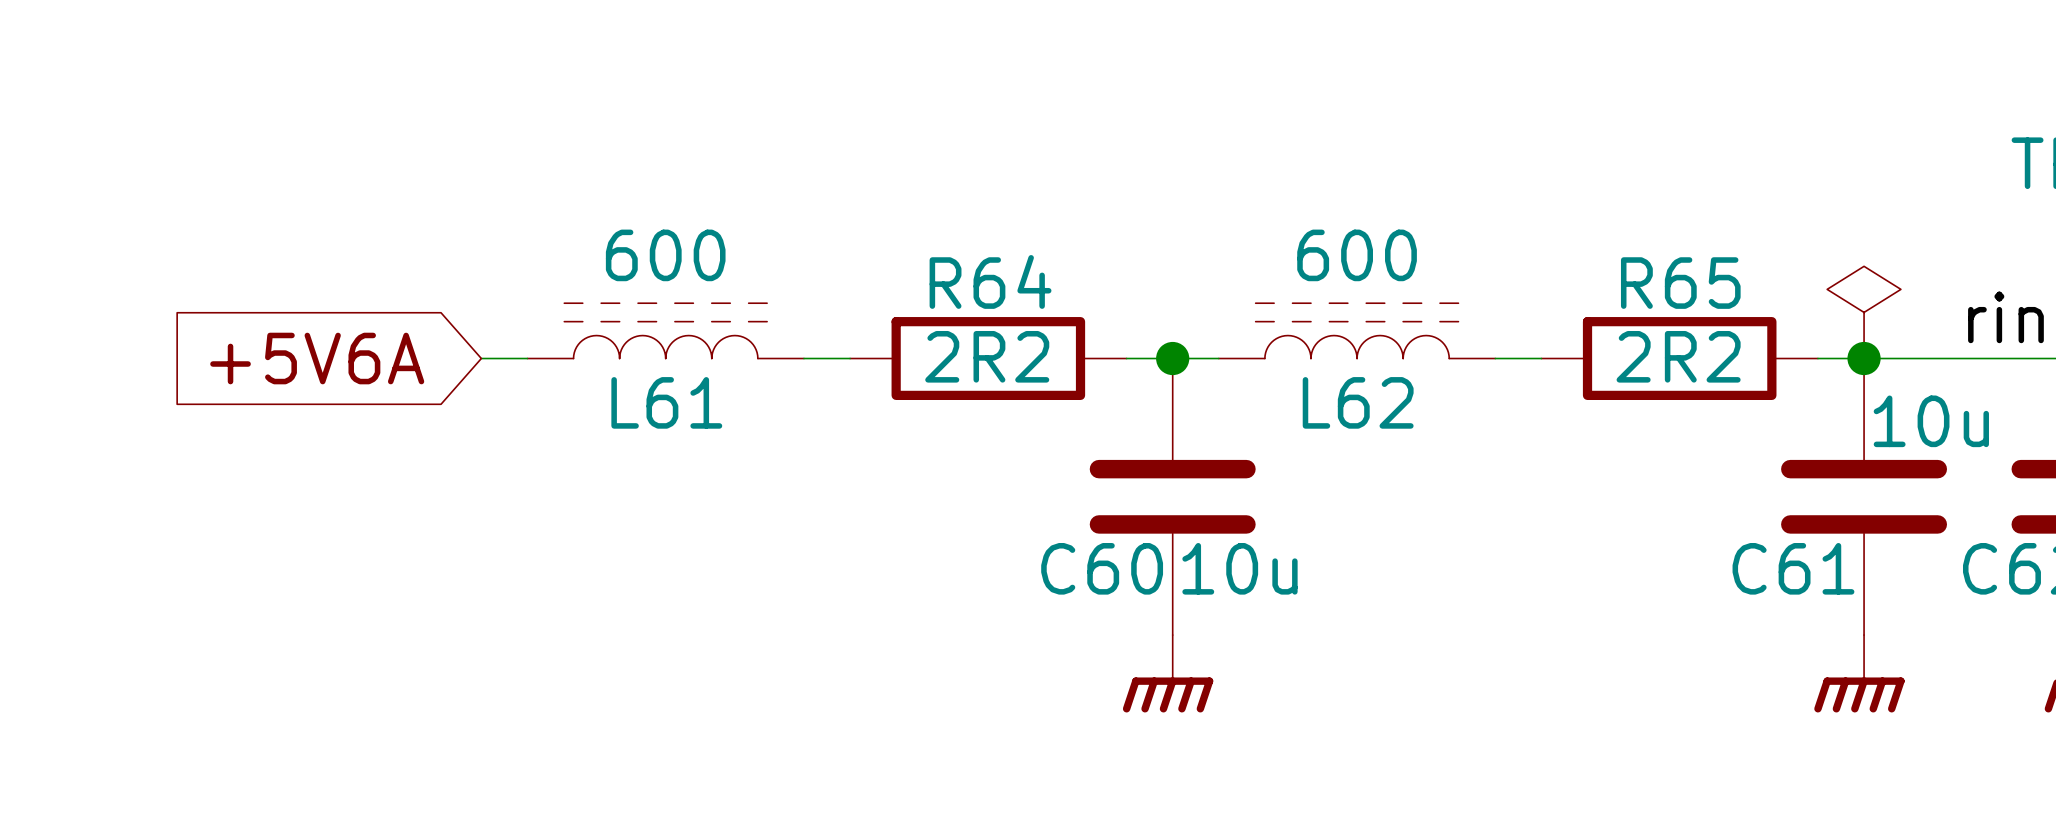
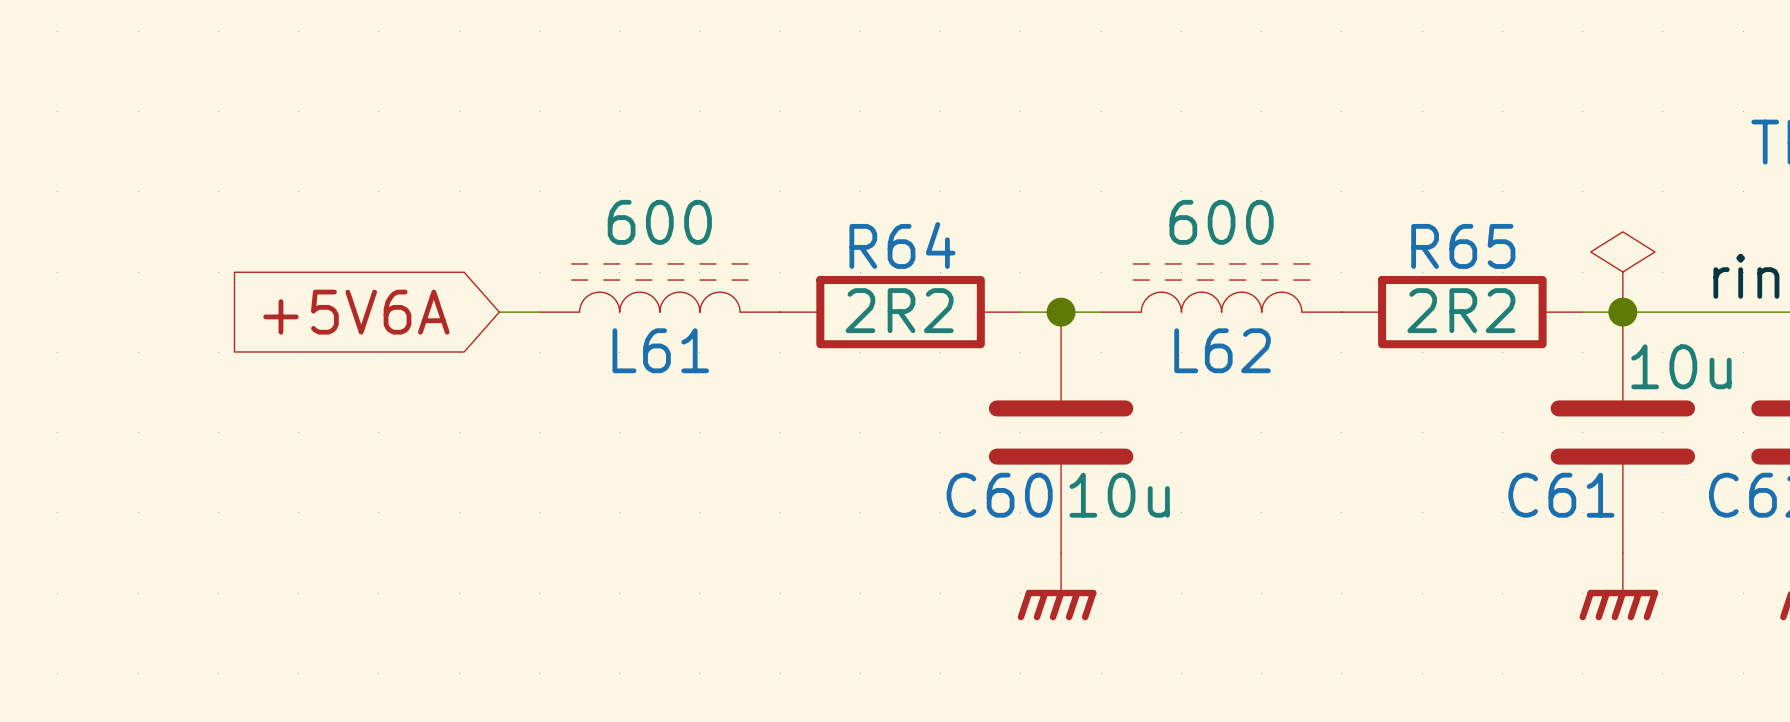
L61 position: (665, 330) -> (659, 288)
L62 position: (1357, 330) -> (1221, 288)
global label position: +5V6A (317, 358) -> +5V6A (356, 312)
wire: (481, 358) (527, 358) -> (499, 312) (539, 312)
wire: (803, 358) (850, 358) -> none
R64 position: (988, 358) -> (900, 312)
junction position: (1172, 358) -> (1061, 312)
C60 position: (1172, 496) -> (1061, 432)
power symbol position: (1168, 673) -> (1057, 586)

